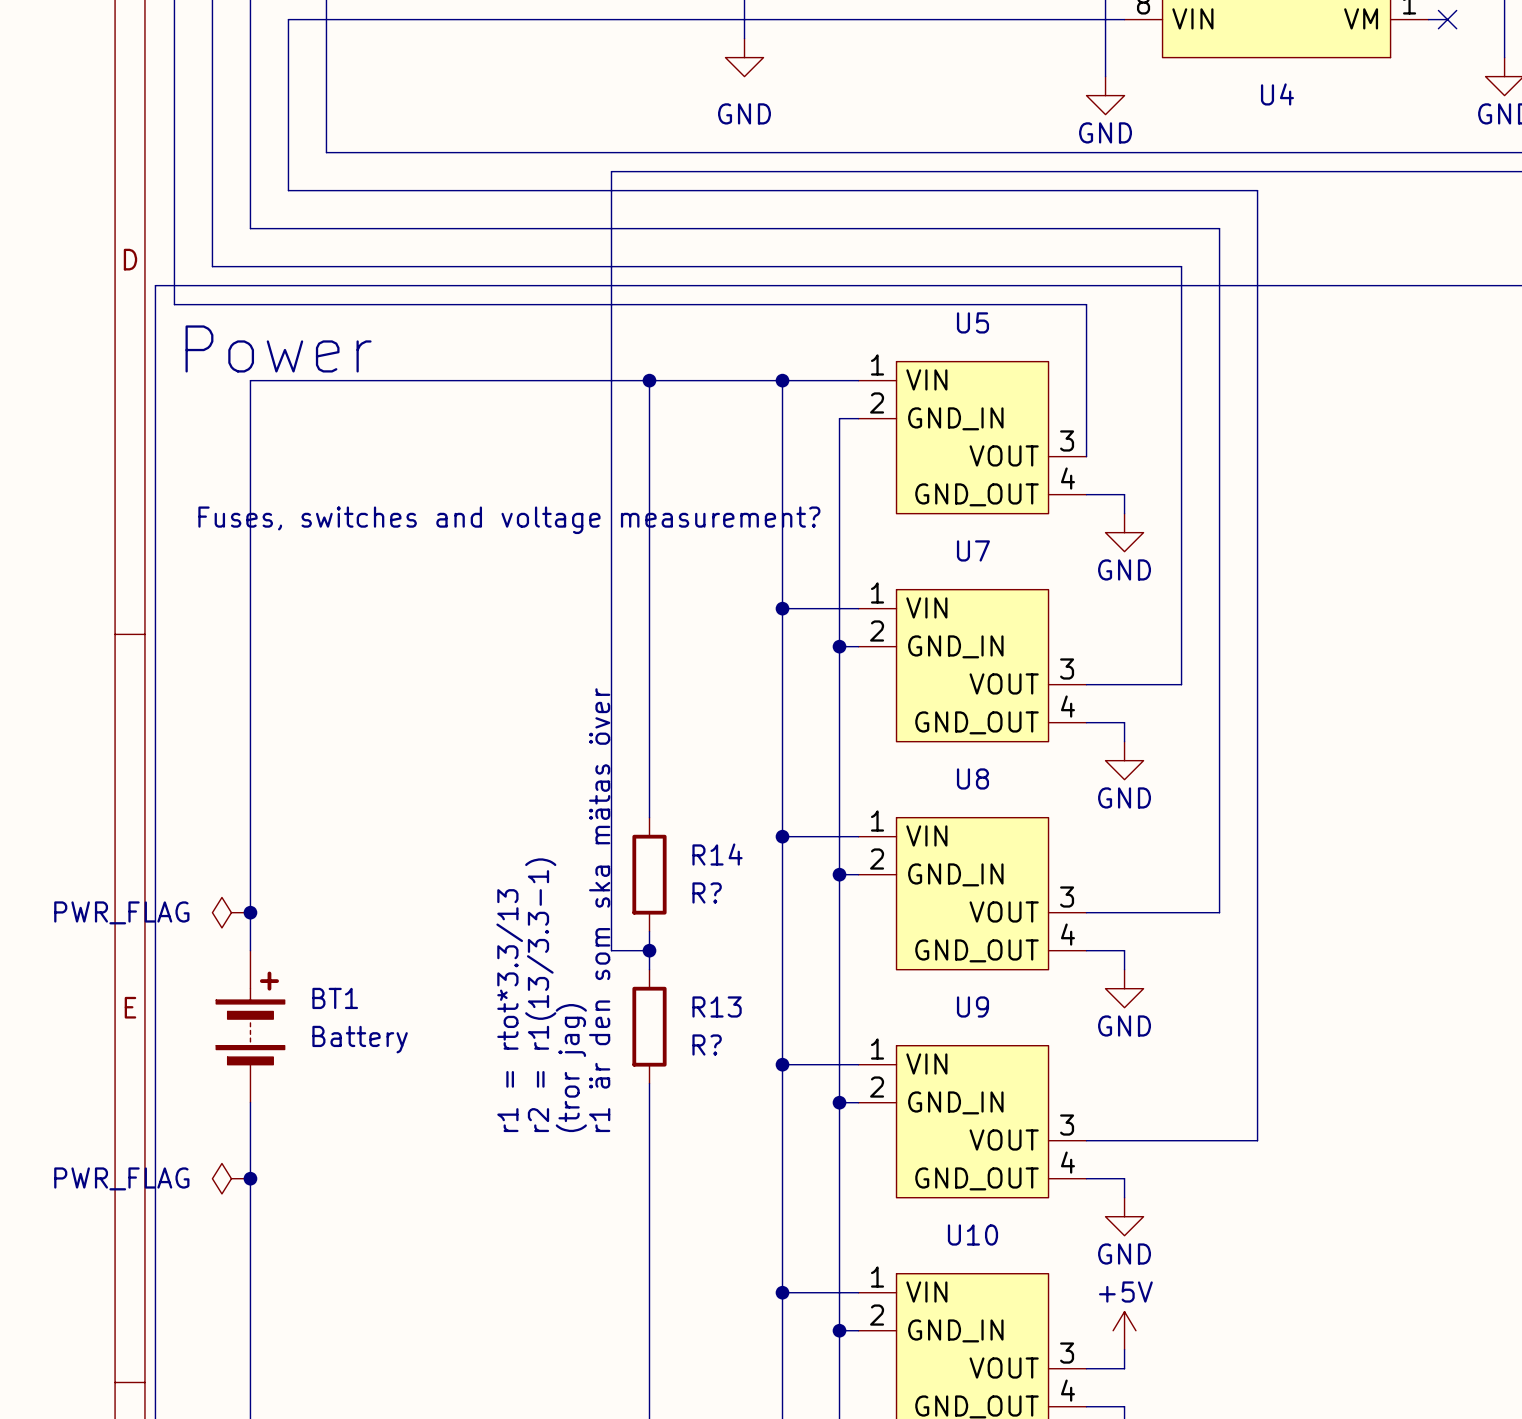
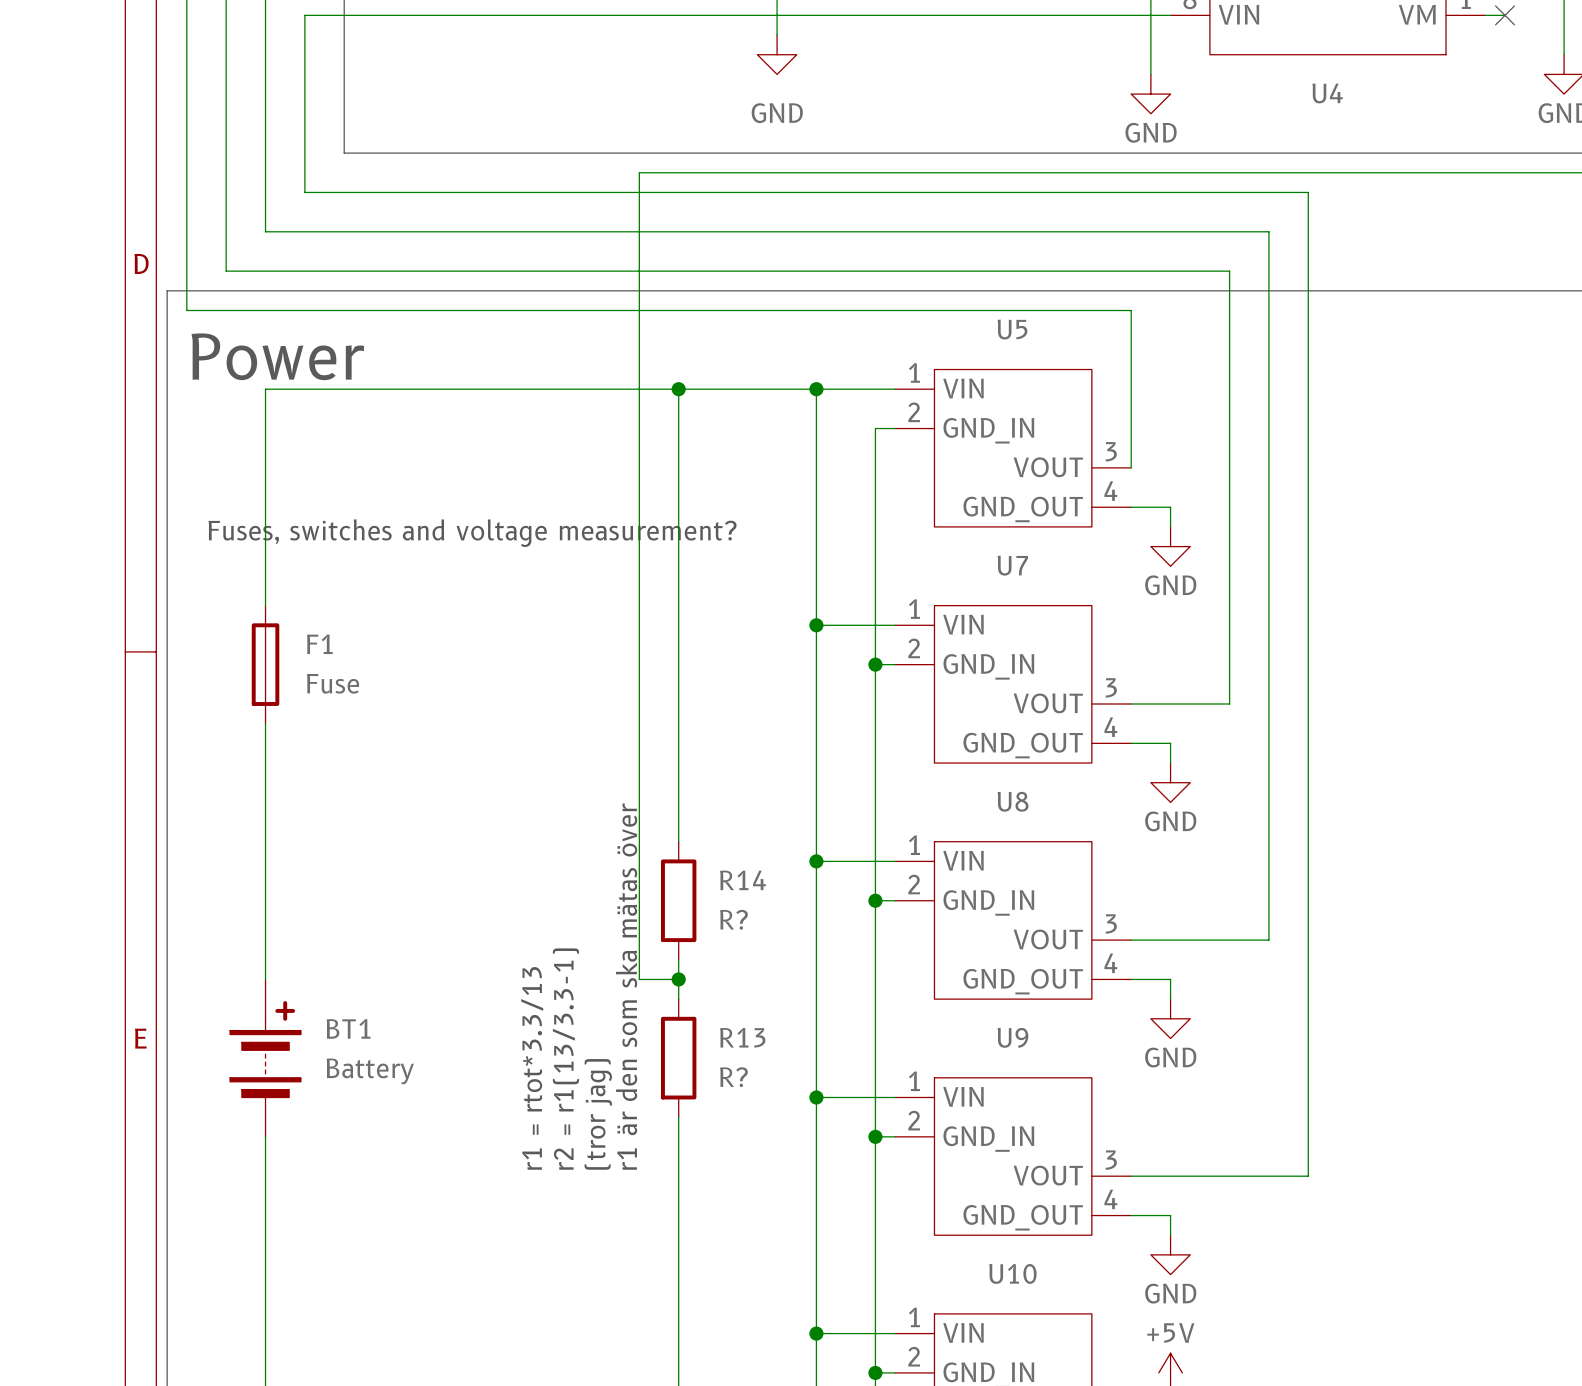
F1: none -> Fuse (265, 664)
power symbol: PWR_FLAG (231, 912) -> none
junction: (250, 912) -> none
power symbol: PWR_FLAG (231, 1178) -> none
junction: (250, 1178) -> none

